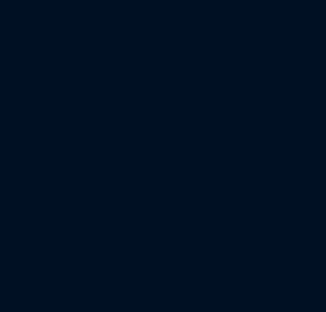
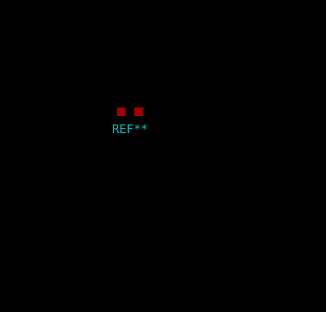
REF**: none -> (129, 111)

